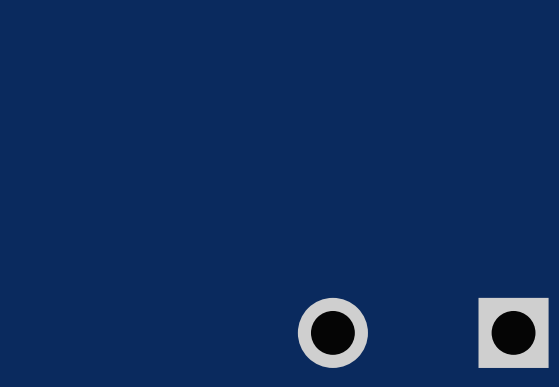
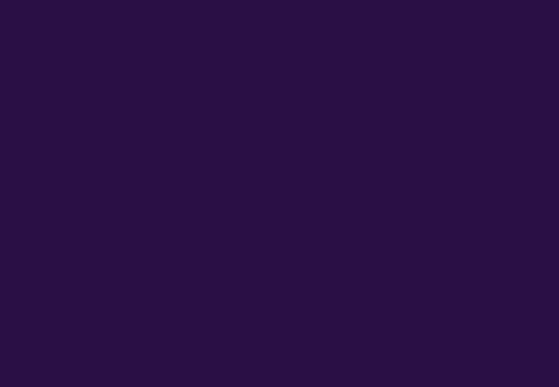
part: (423, 332) -> none

